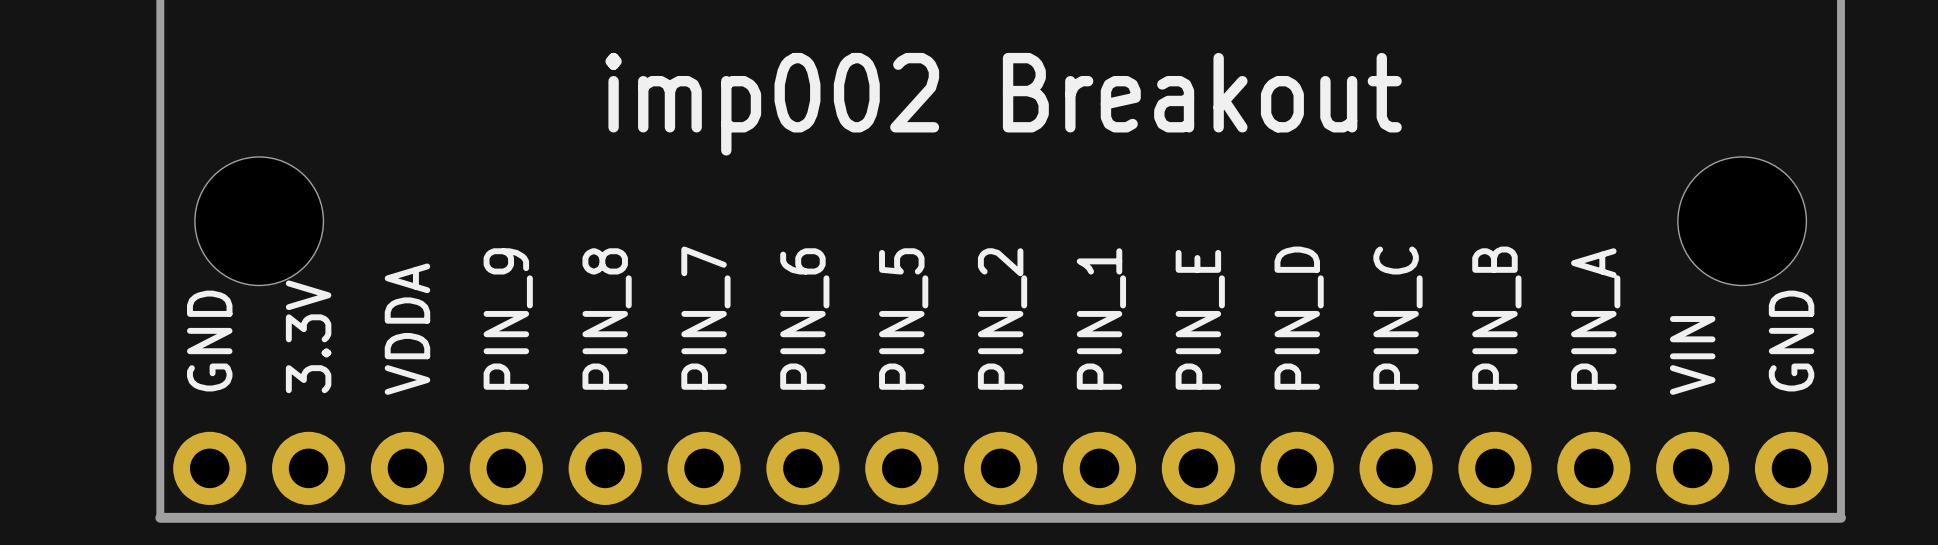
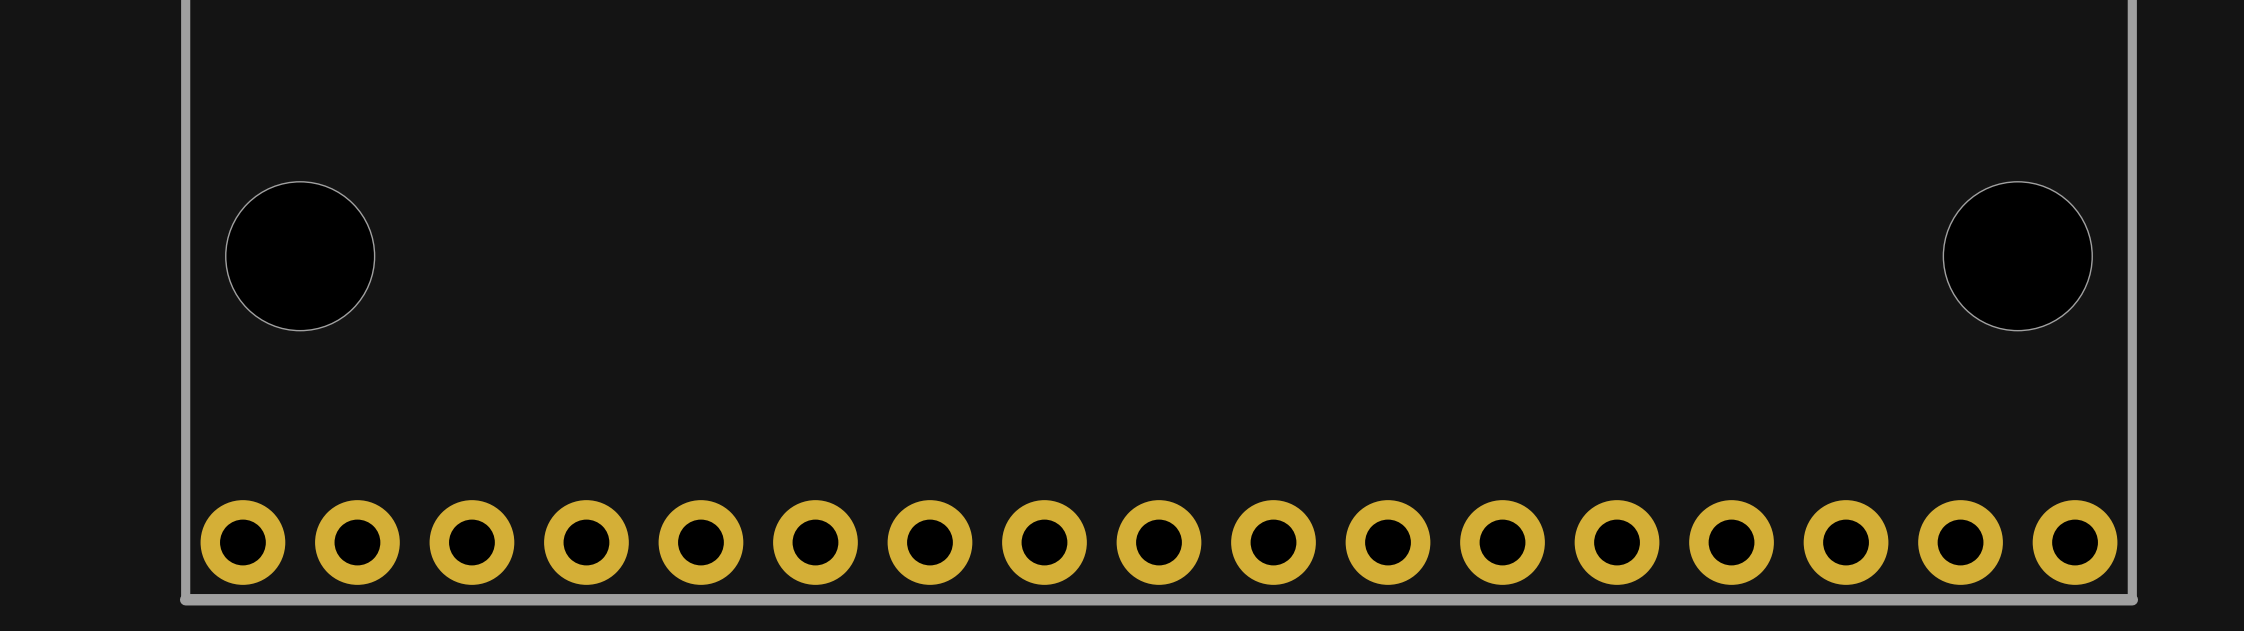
text: imp002 Breakout (1003, 104) -> none
text: PIN_7 (705, 318) -> none
text: PIN_D (1299, 318) -> none
text: PIN_C (1397, 318) -> none
text: PIN_B (1496, 318) -> none
text: PIN_9 (508, 319) -> none
text: PIN_8 (607, 319) -> none
text: PIN_6 (804, 319) -> none
text: PIN_5 (903, 319) -> none
text: PIN_2 (1002, 319) -> none
text: PIN_1 (1101, 319) -> none
text: PIN_E (1200, 319) -> none
text: PIN_A (1595, 319) -> none
text: VDDA (407, 329) -> none
text: 3.3V (308, 336) -> none
text: GND (209, 341) -> none
text: GND (1791, 341) -> none
text: VIN (1692, 355) -> none

